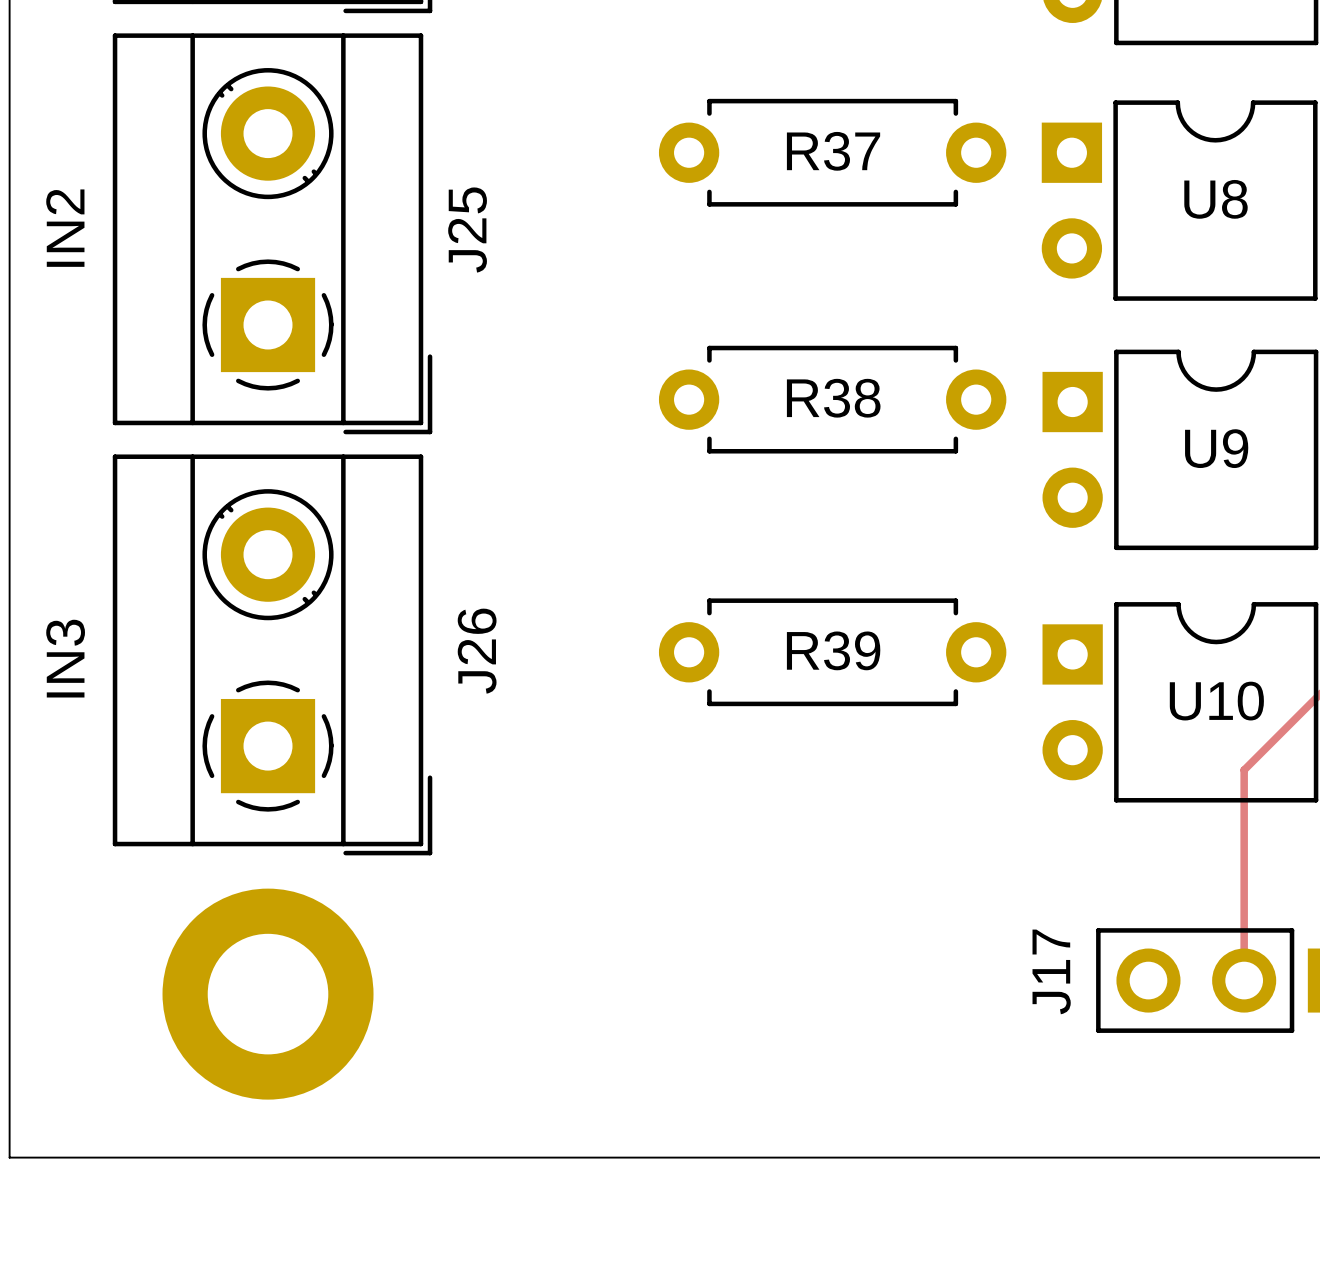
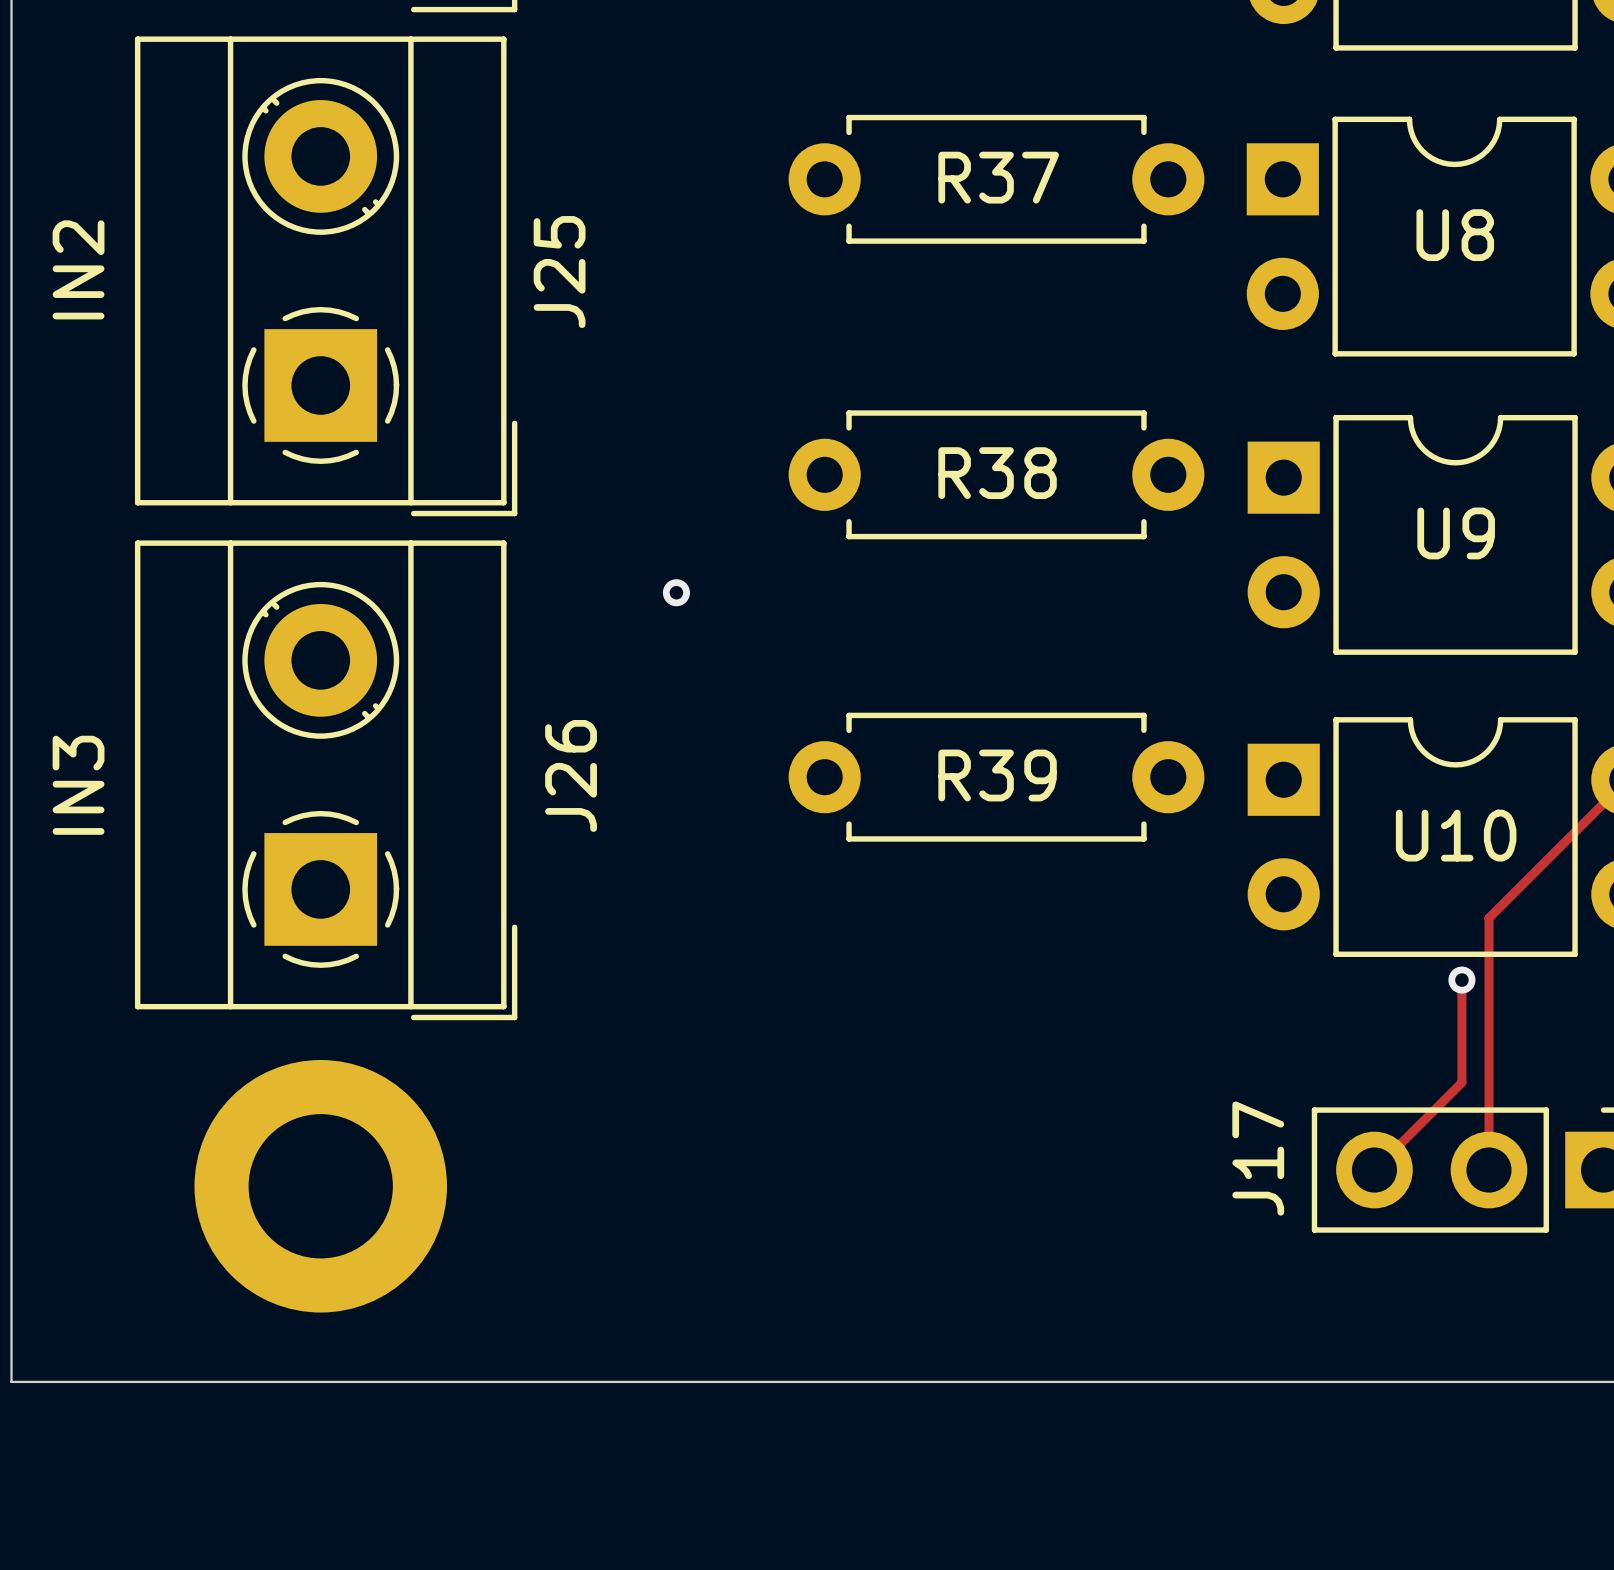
via: none -> (676, 592)
track: none -> (1461, 980) (1461, 1082) (1374, 1170)
via: none -> (1461, 980)

